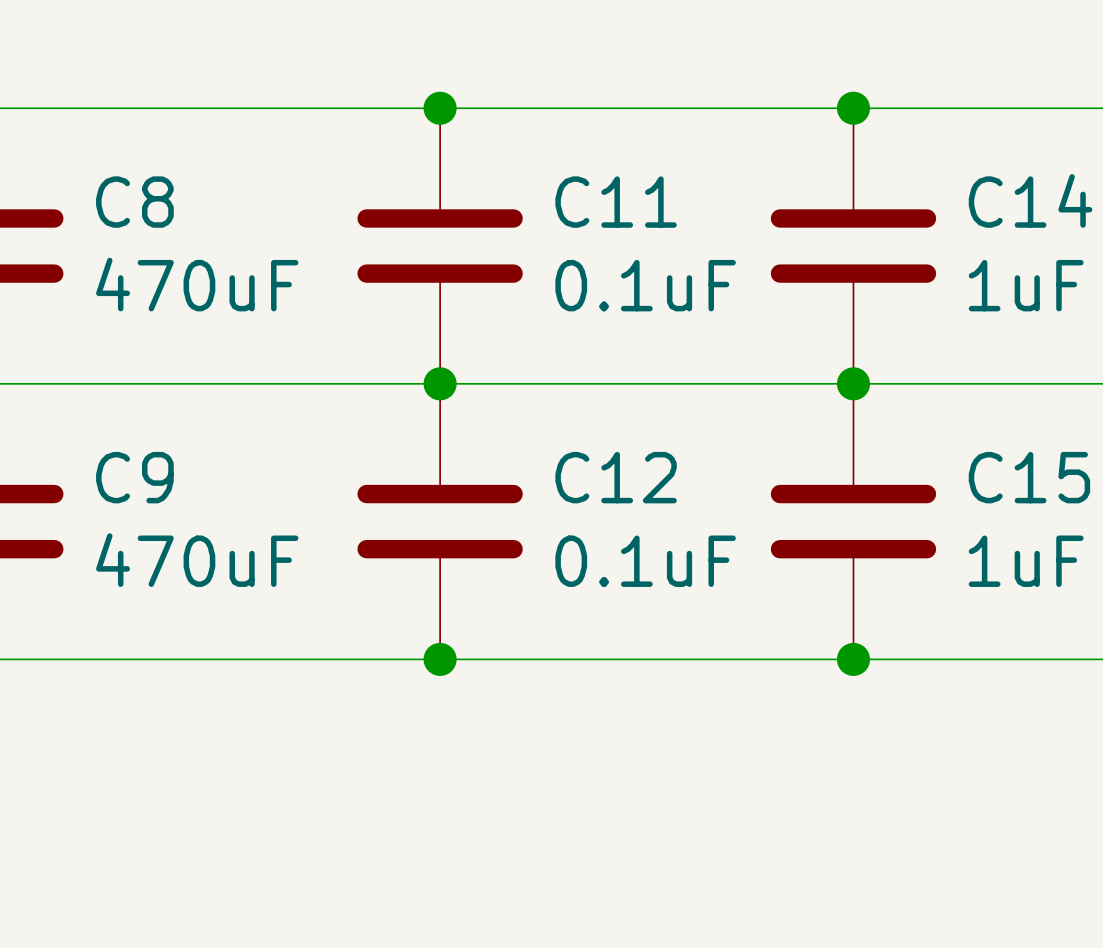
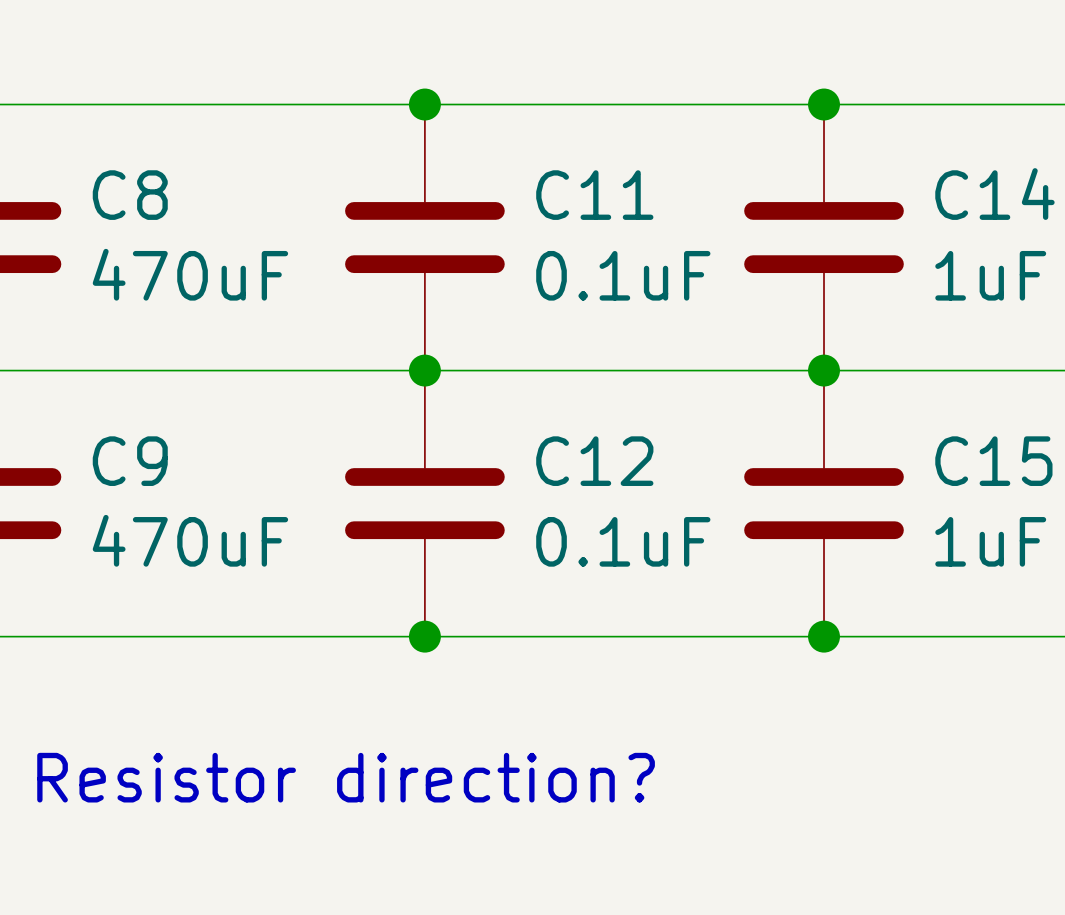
text: none -> Resistor direction? (346, 777)

